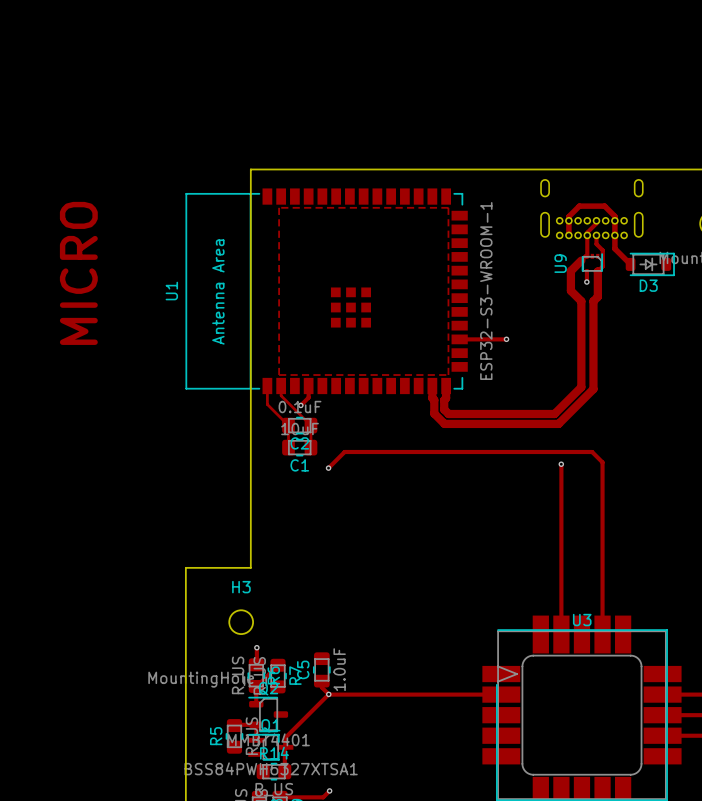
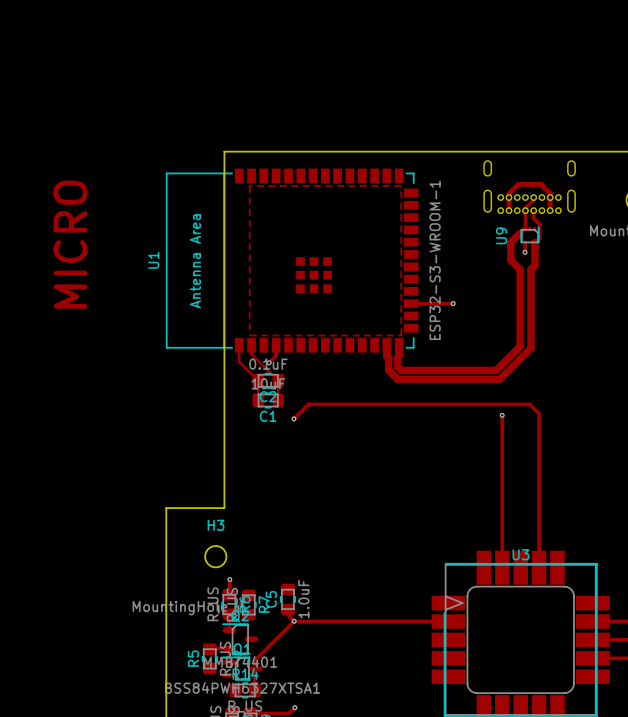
track: (614, 235) (614, 248) (630, 264) -> none
D3: (650, 264) -> none

